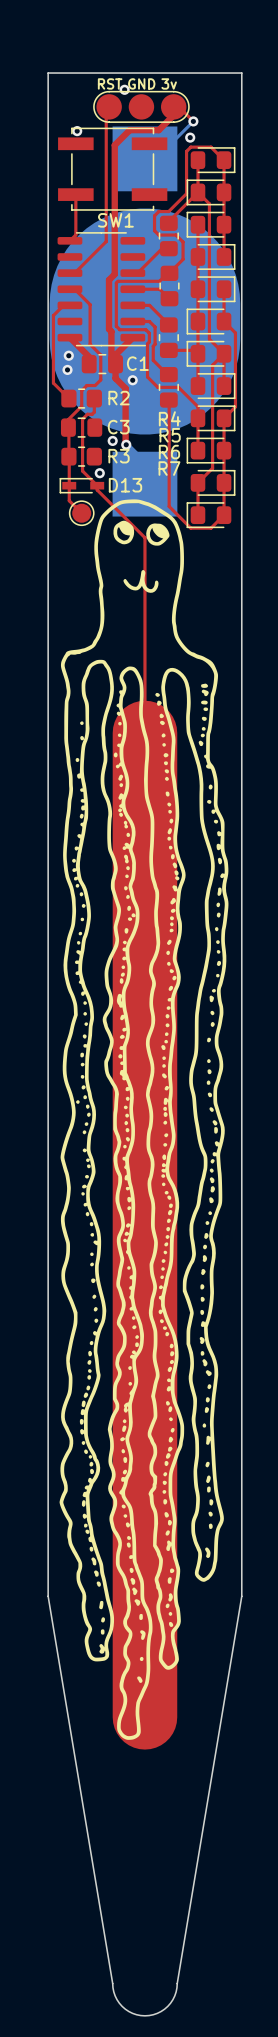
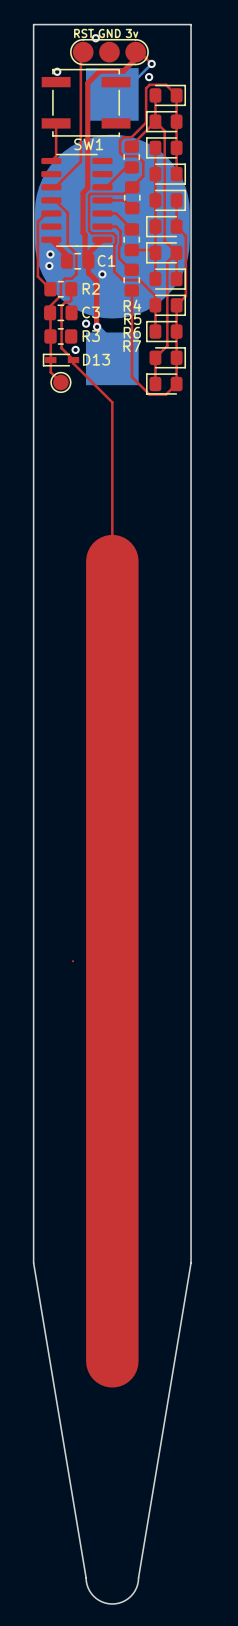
drawing: [59, 499, 229, 1740] -> none

